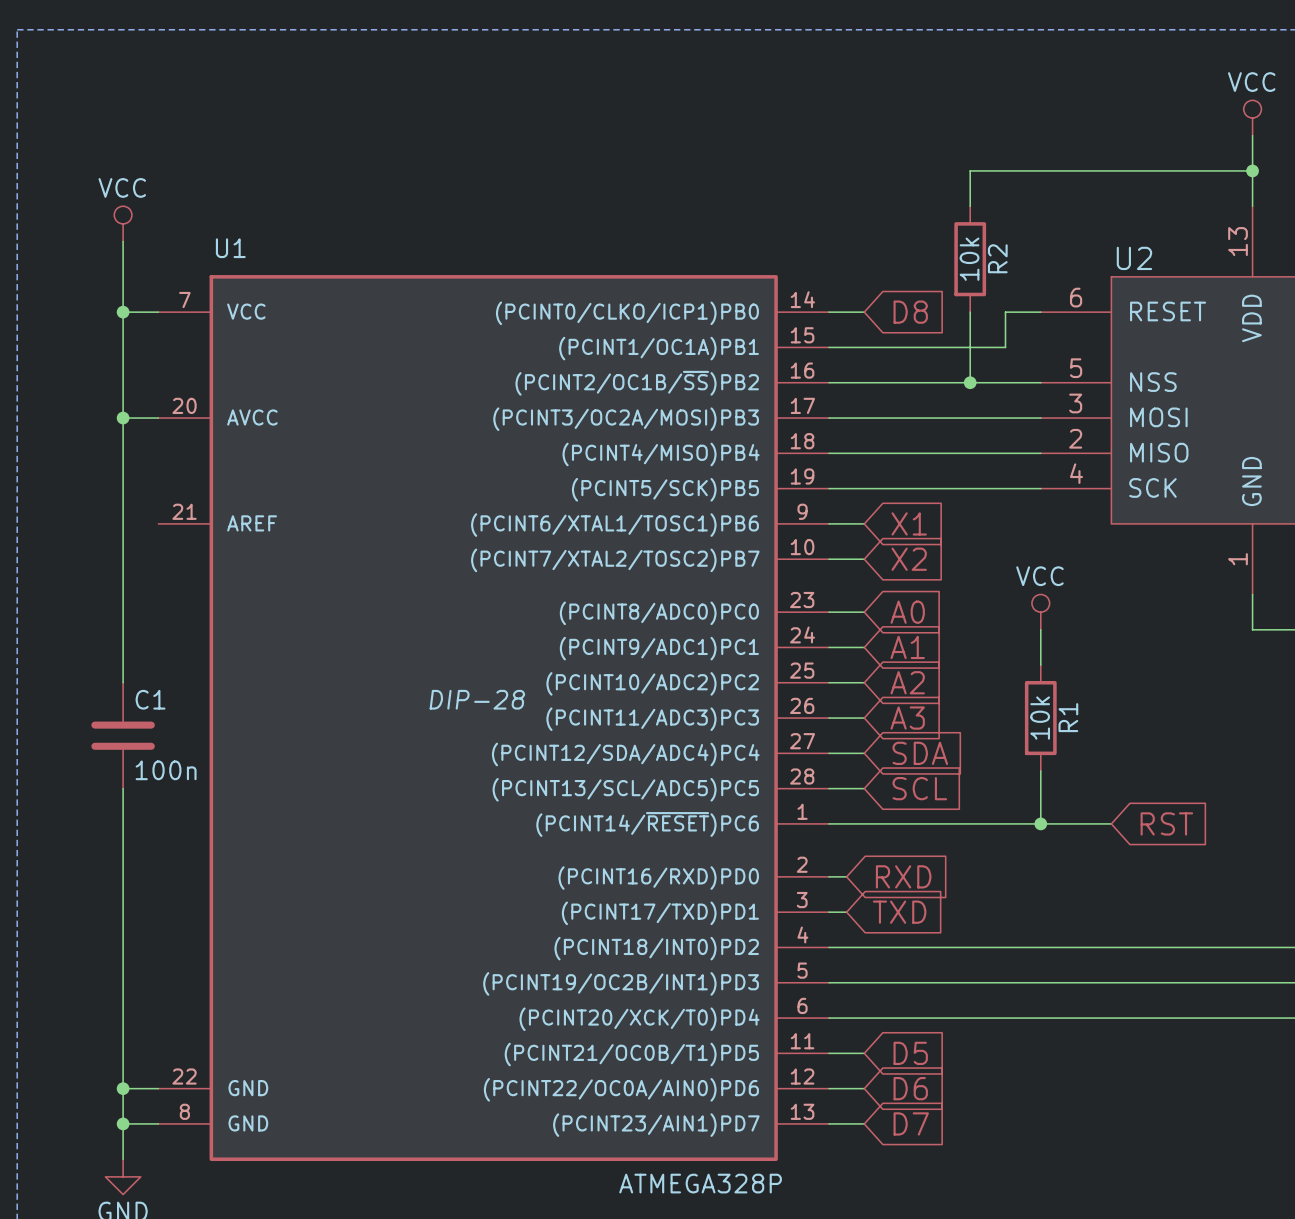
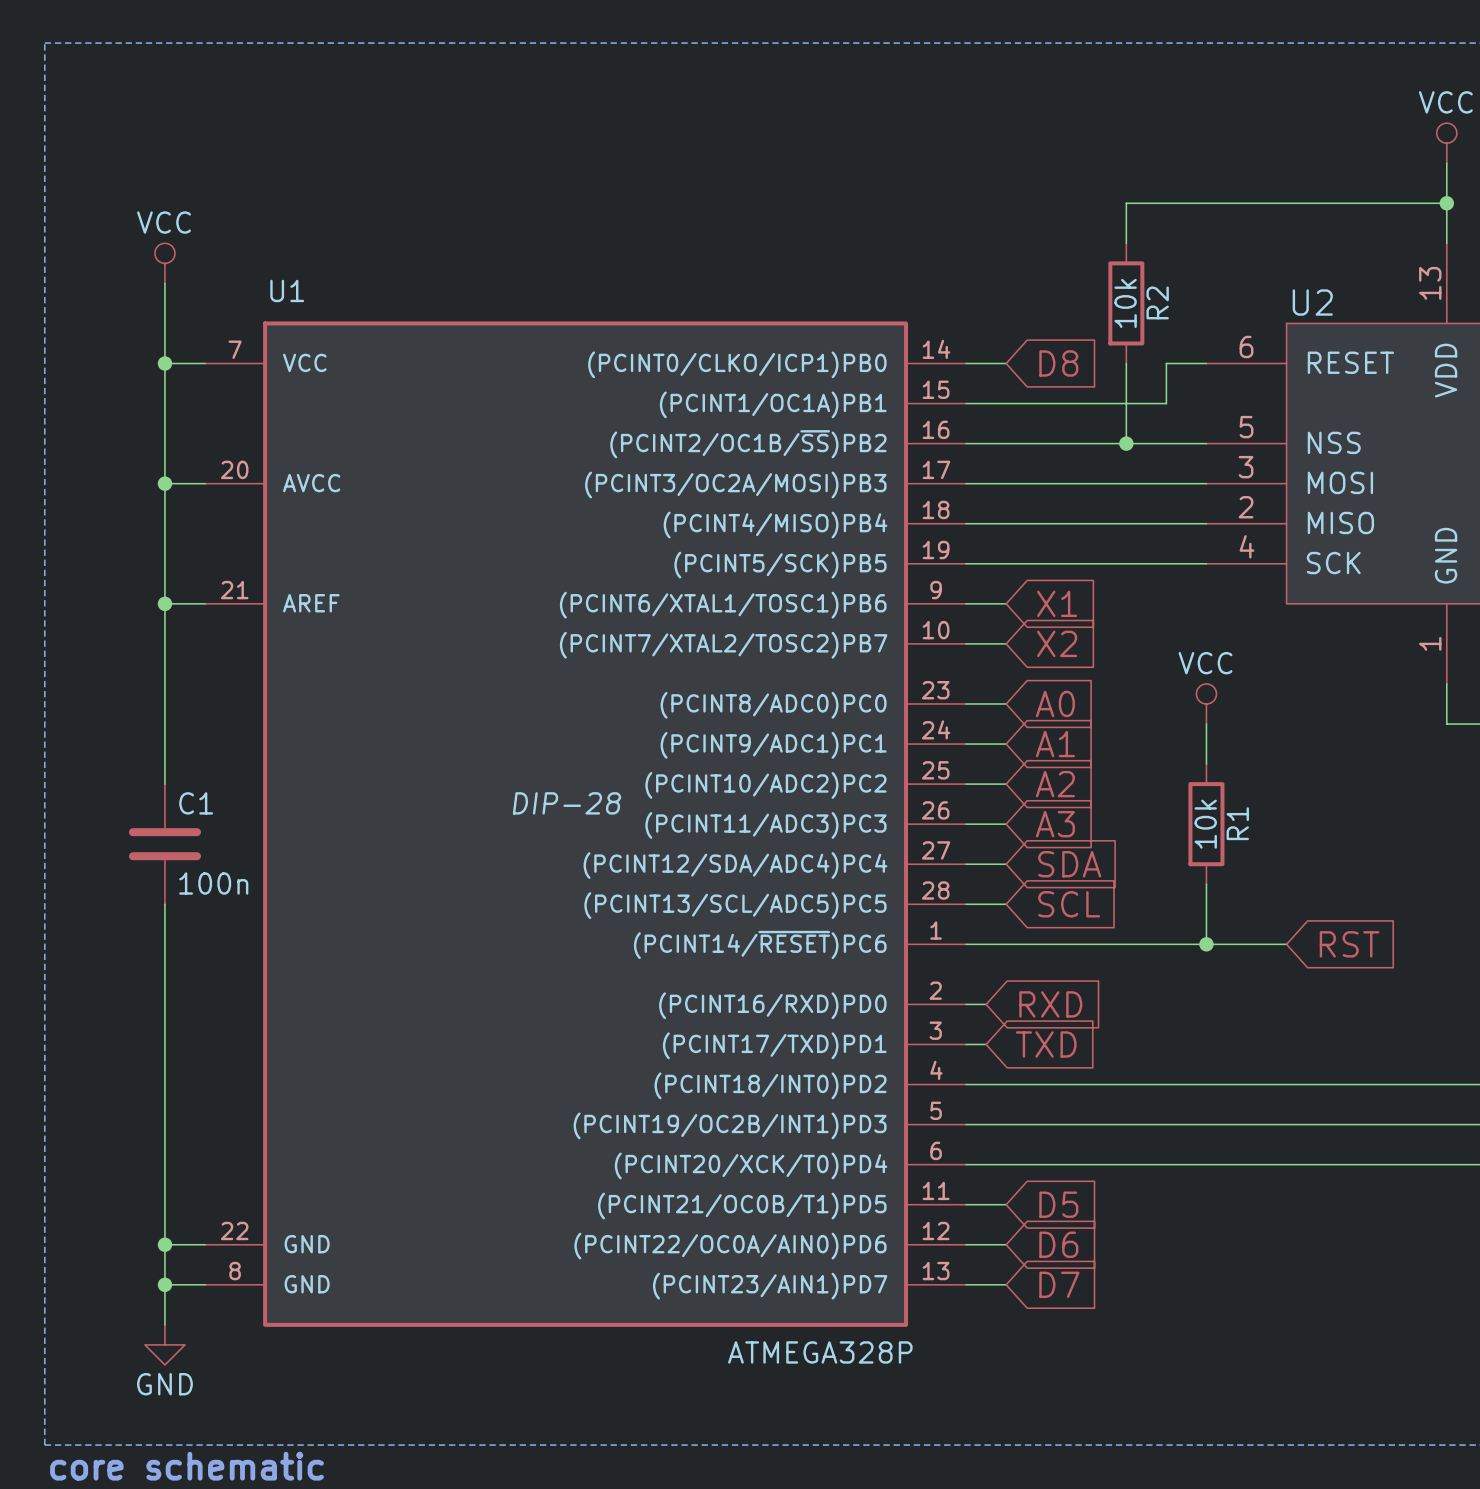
wire: none -> (164, 603) (205, 603)
junction: none -> (164, 603)

